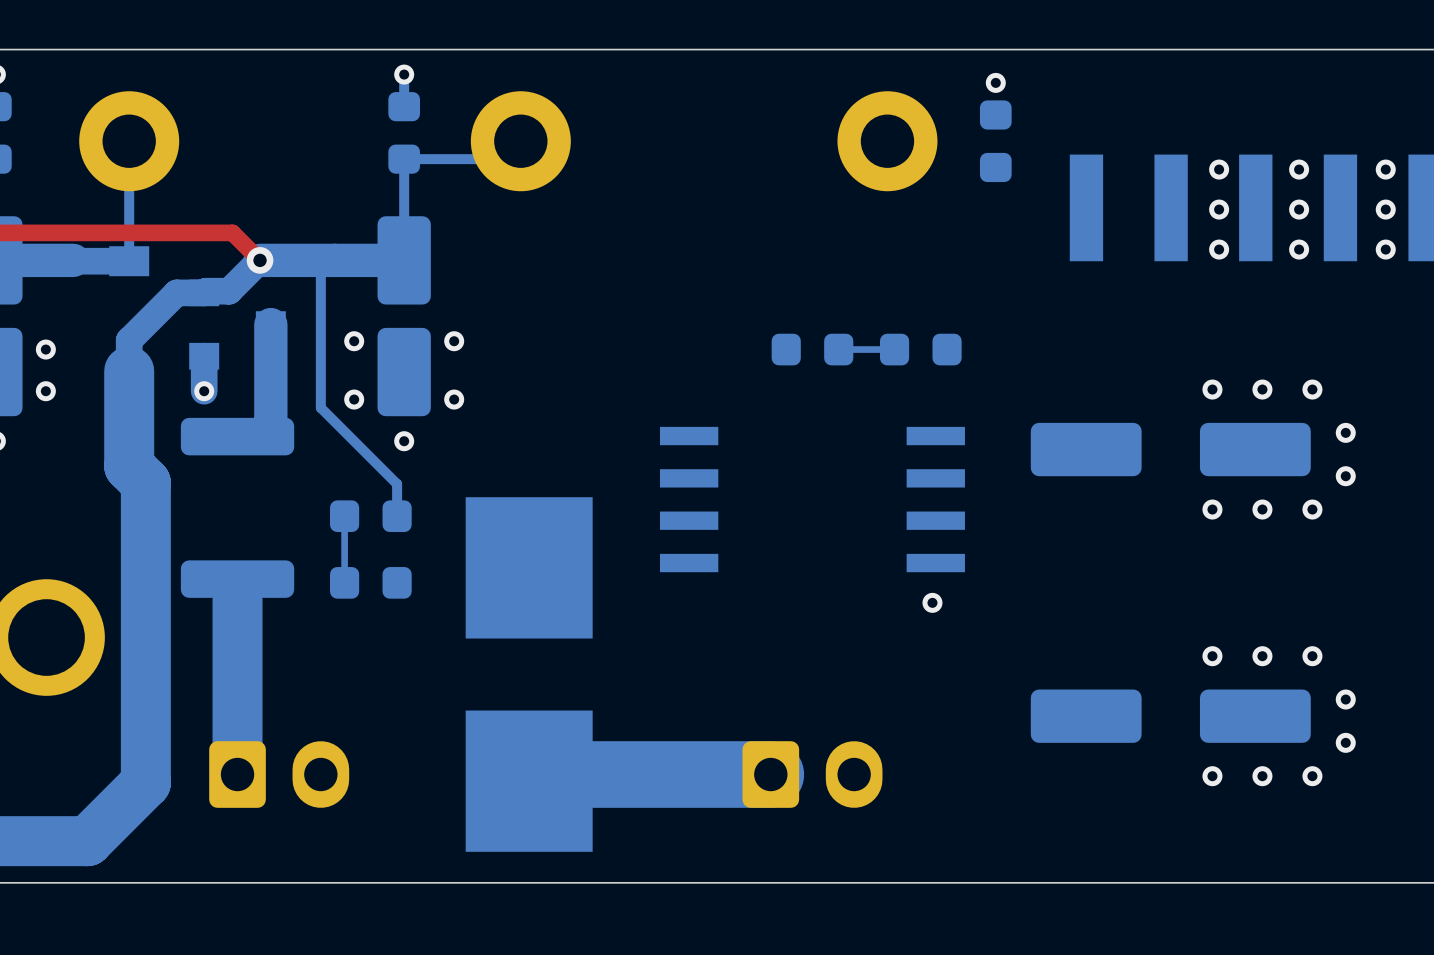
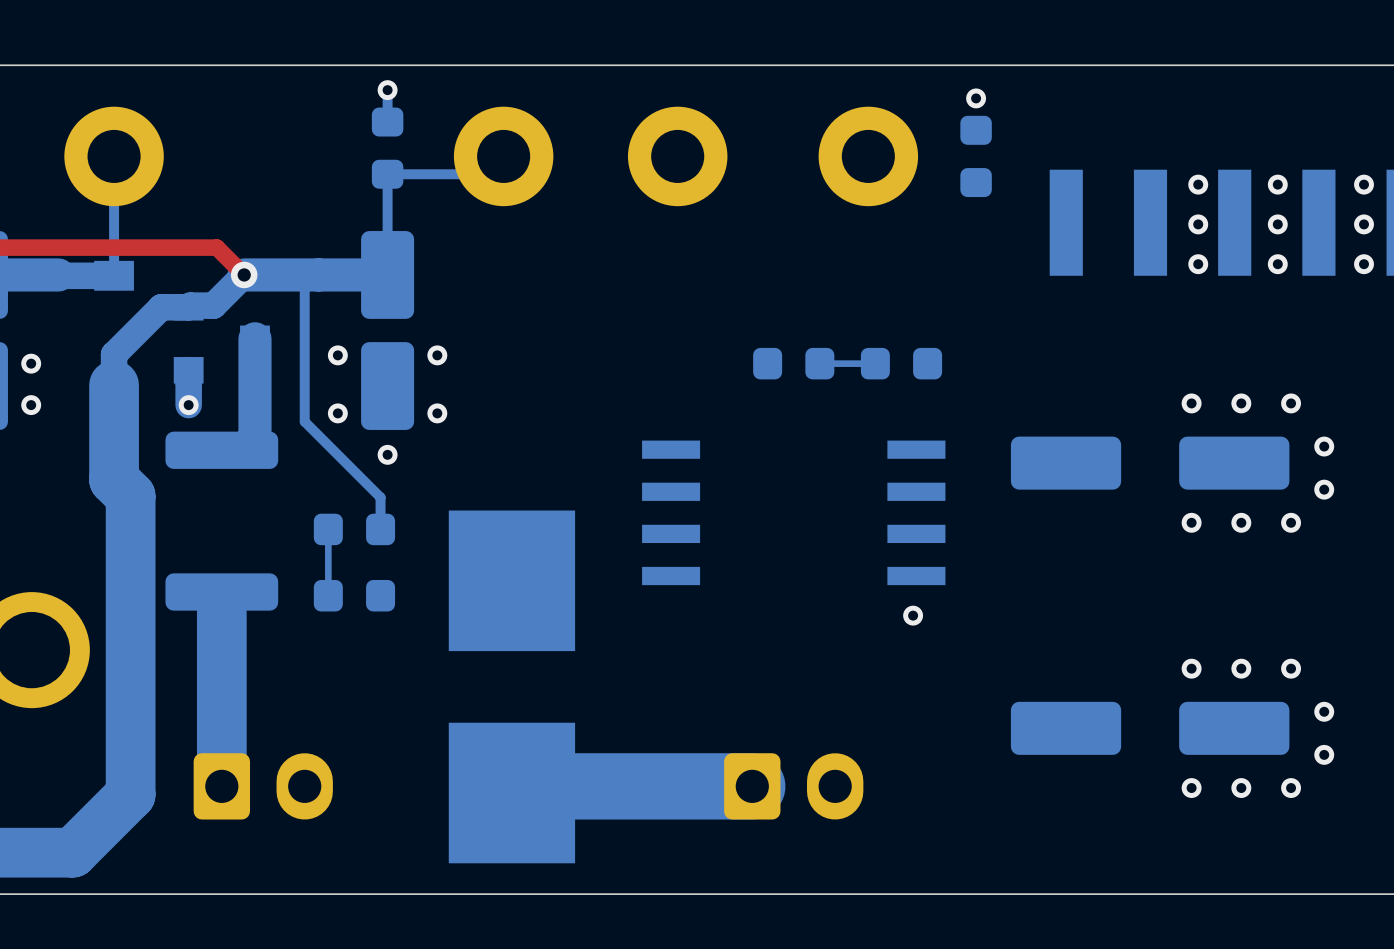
part: none -> (677, 156)

